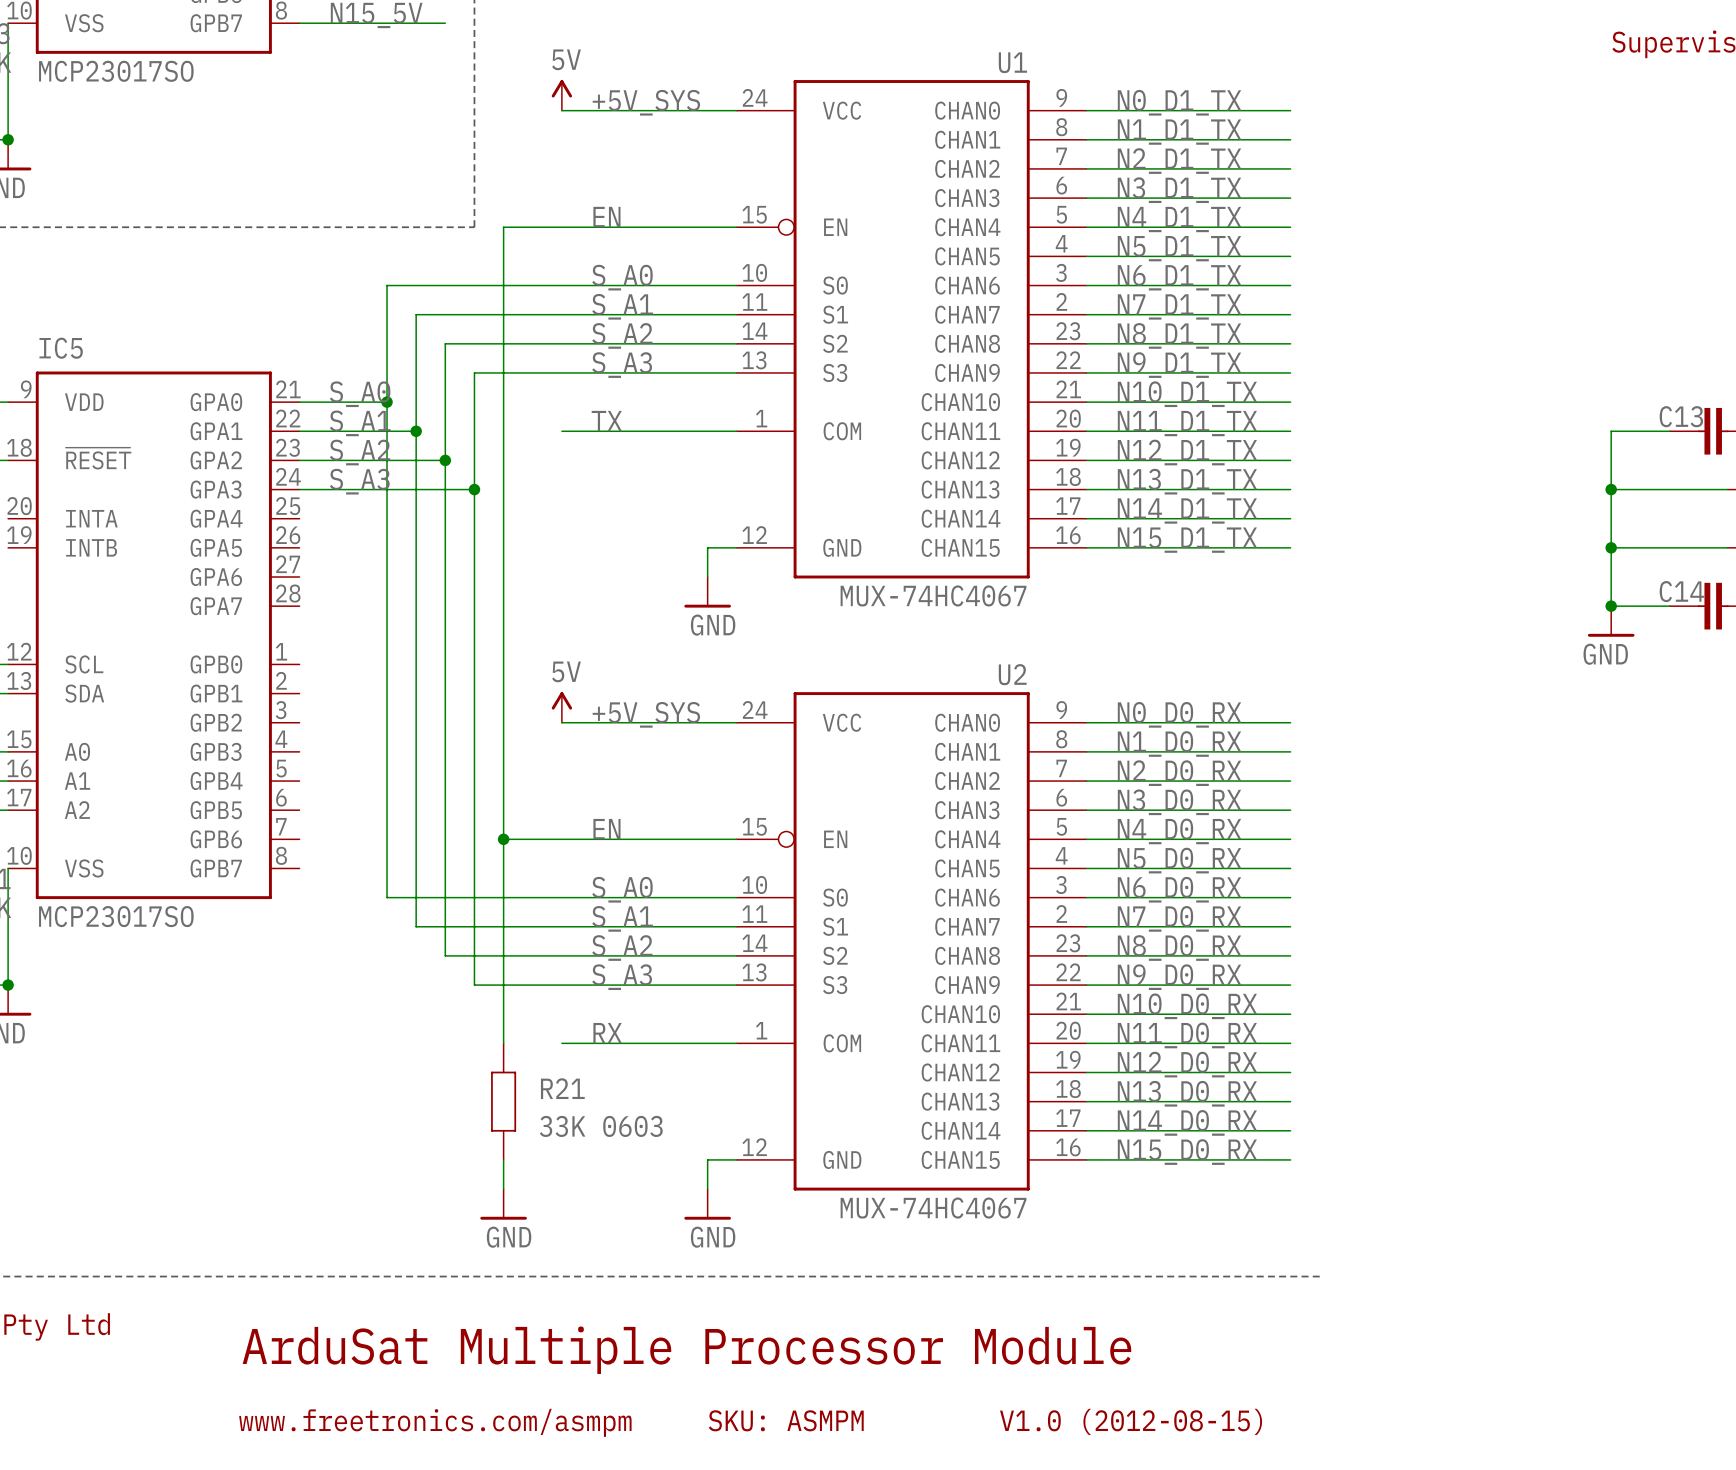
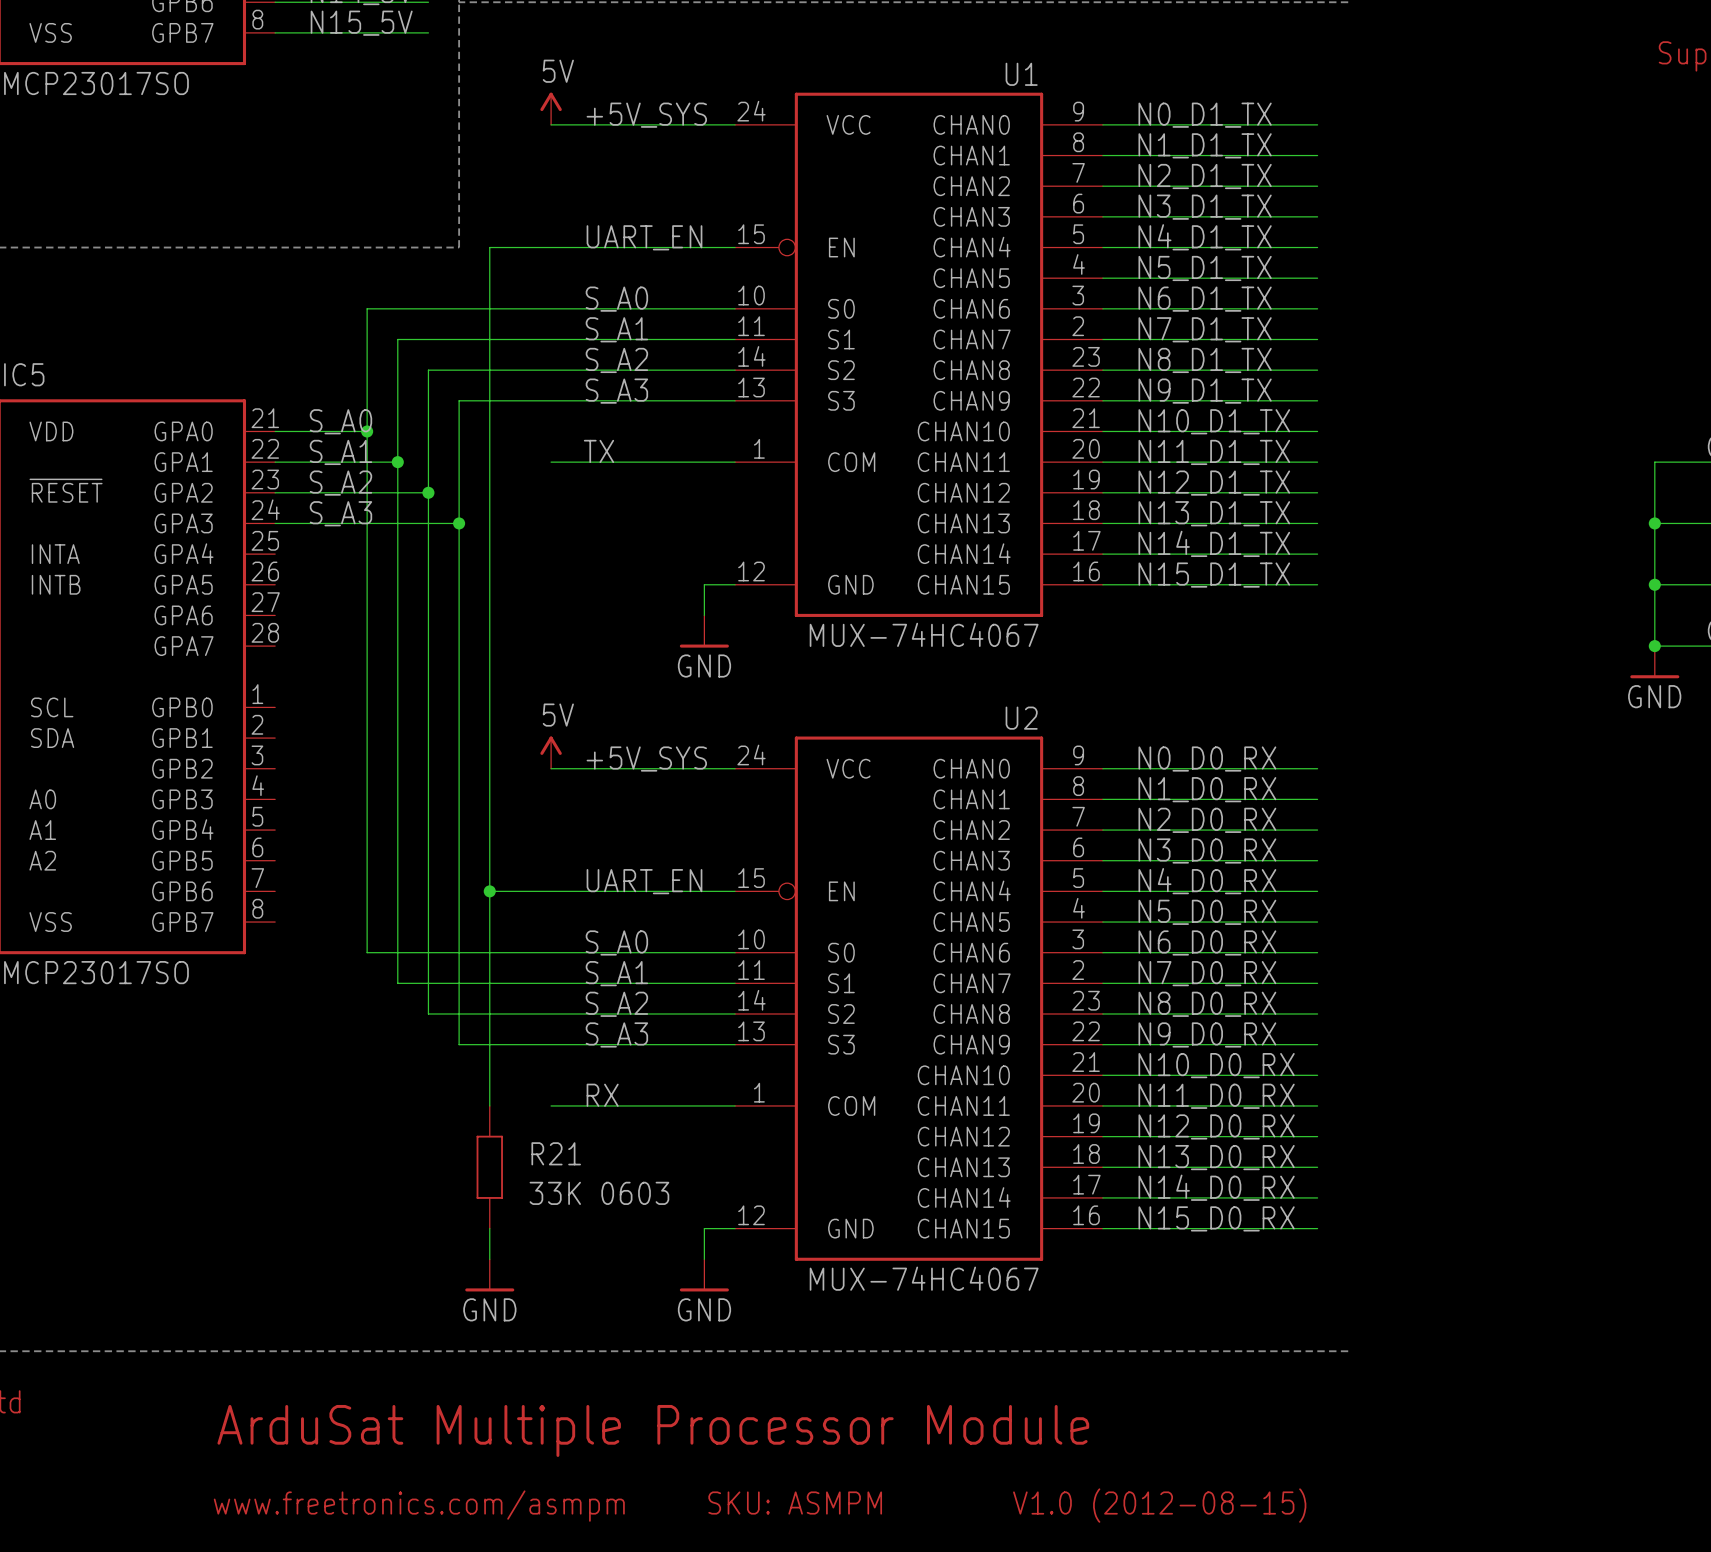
label: EN (606, 217) -> UART_EN (644, 237)
label: EN (606, 829) -> UART_EN (644, 881)

